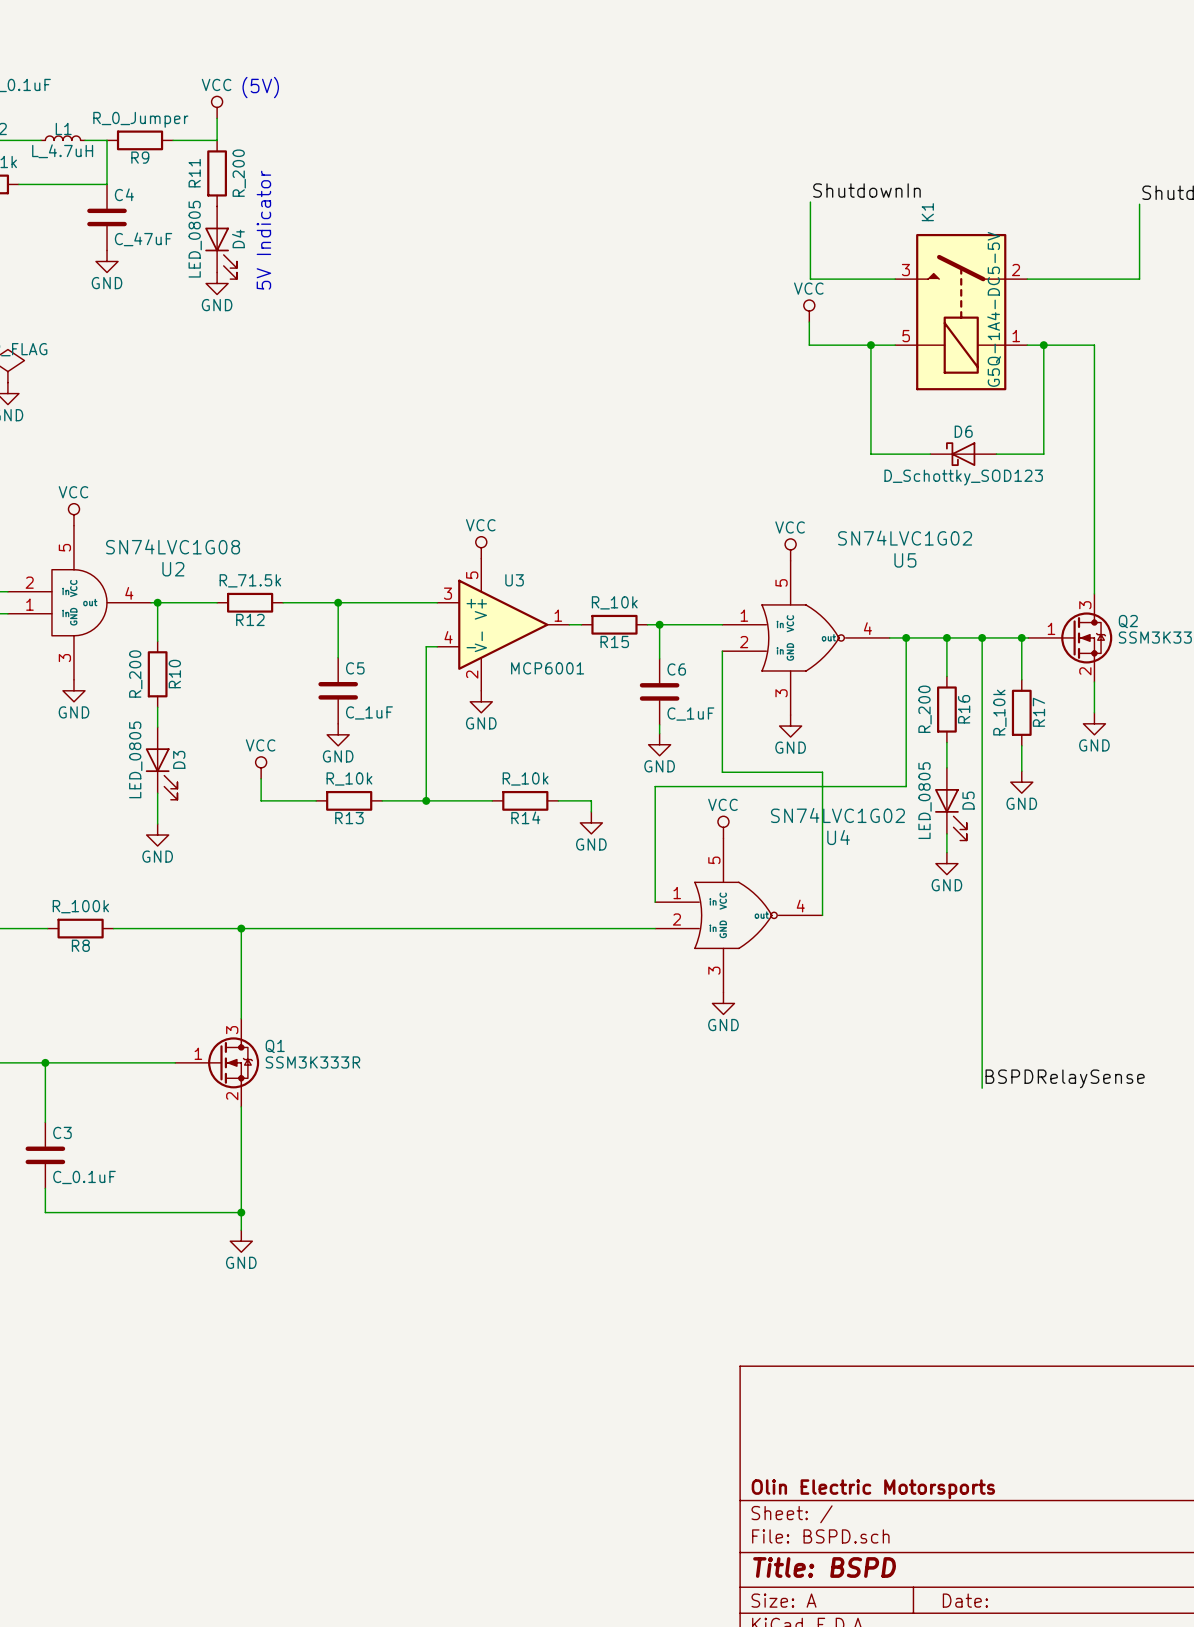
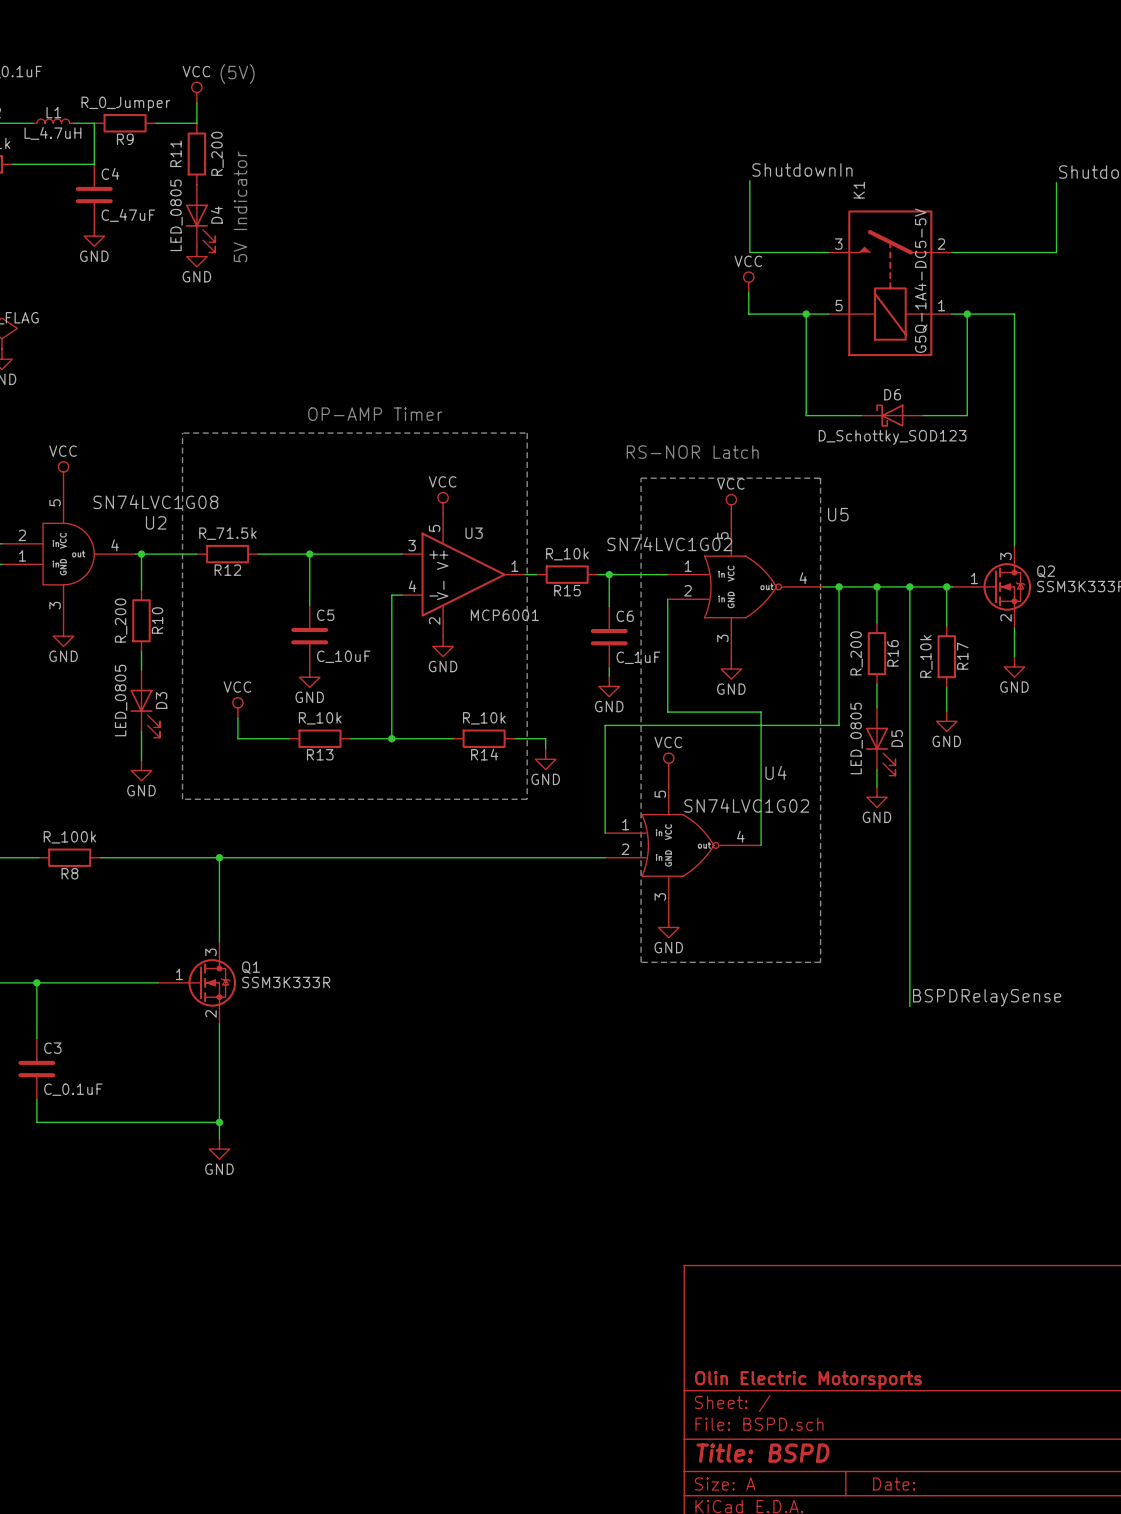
text: none -> OP-AMP Timer (375, 414)
line: none -> (182, 433) (182, 799) (527, 799) (527, 433) (183, 433)
text: none -> RS-NOR Latch (692, 452)
line: none -> (641, 478) (641, 962) (820, 962) (820, 478) (641, 478)
U5 value position: SN74LVC1G02 (905, 538) -> SN74LVC1G02 (669, 544)
C5 value: C_1uF (369, 712) -> C_10uF (343, 656)
U4 value position: SN74LVC1G02 (837, 815) -> SN74LVC1G02 (746, 805)

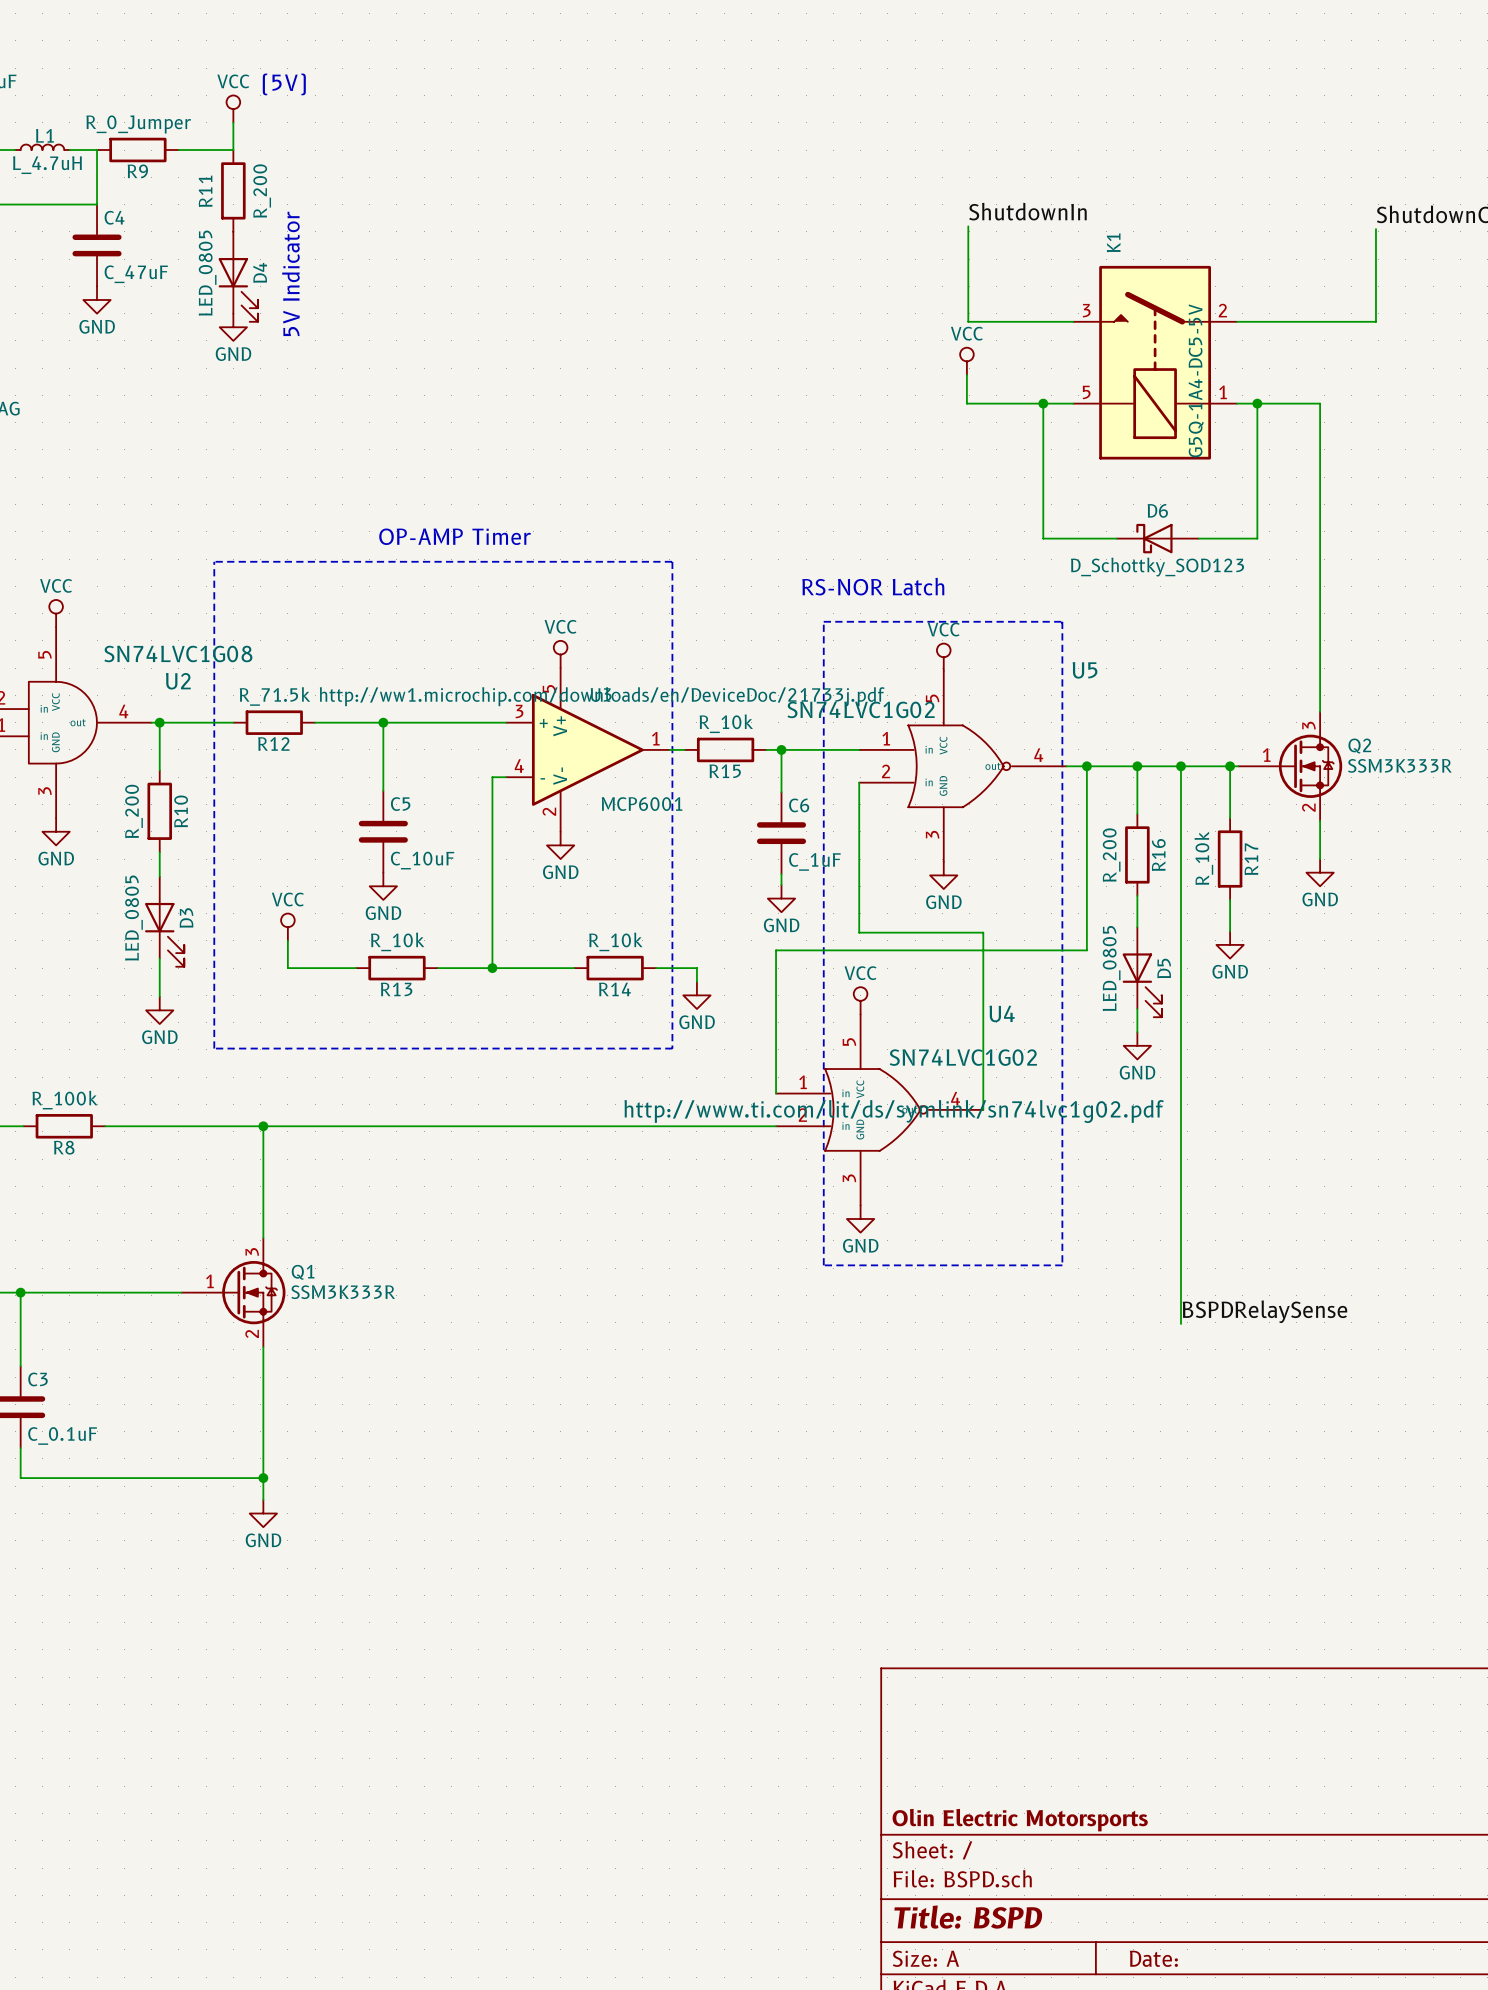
U3 text: none -> http://ww1.microchip.com/downloads/en/DeviceDoc/21733j.pdf (602, 696)
U4 text: none -> http://www.ti.com/lit/ds/symlink/sn74lvc1g02.pdf (894, 1111)

